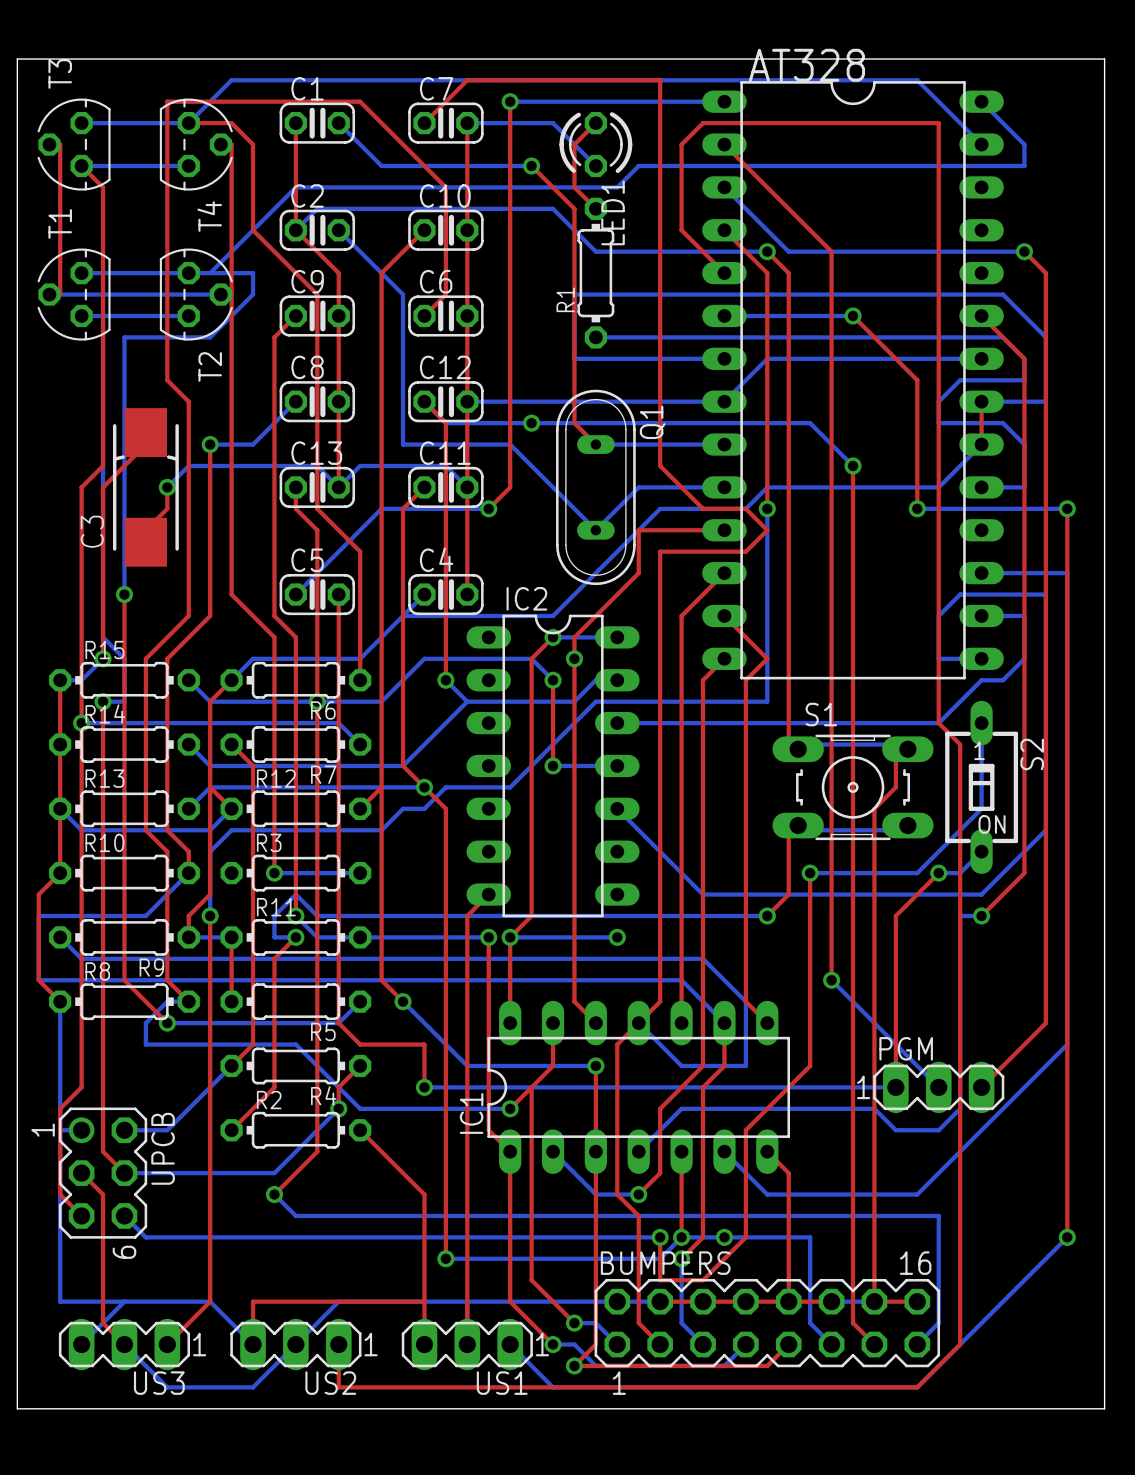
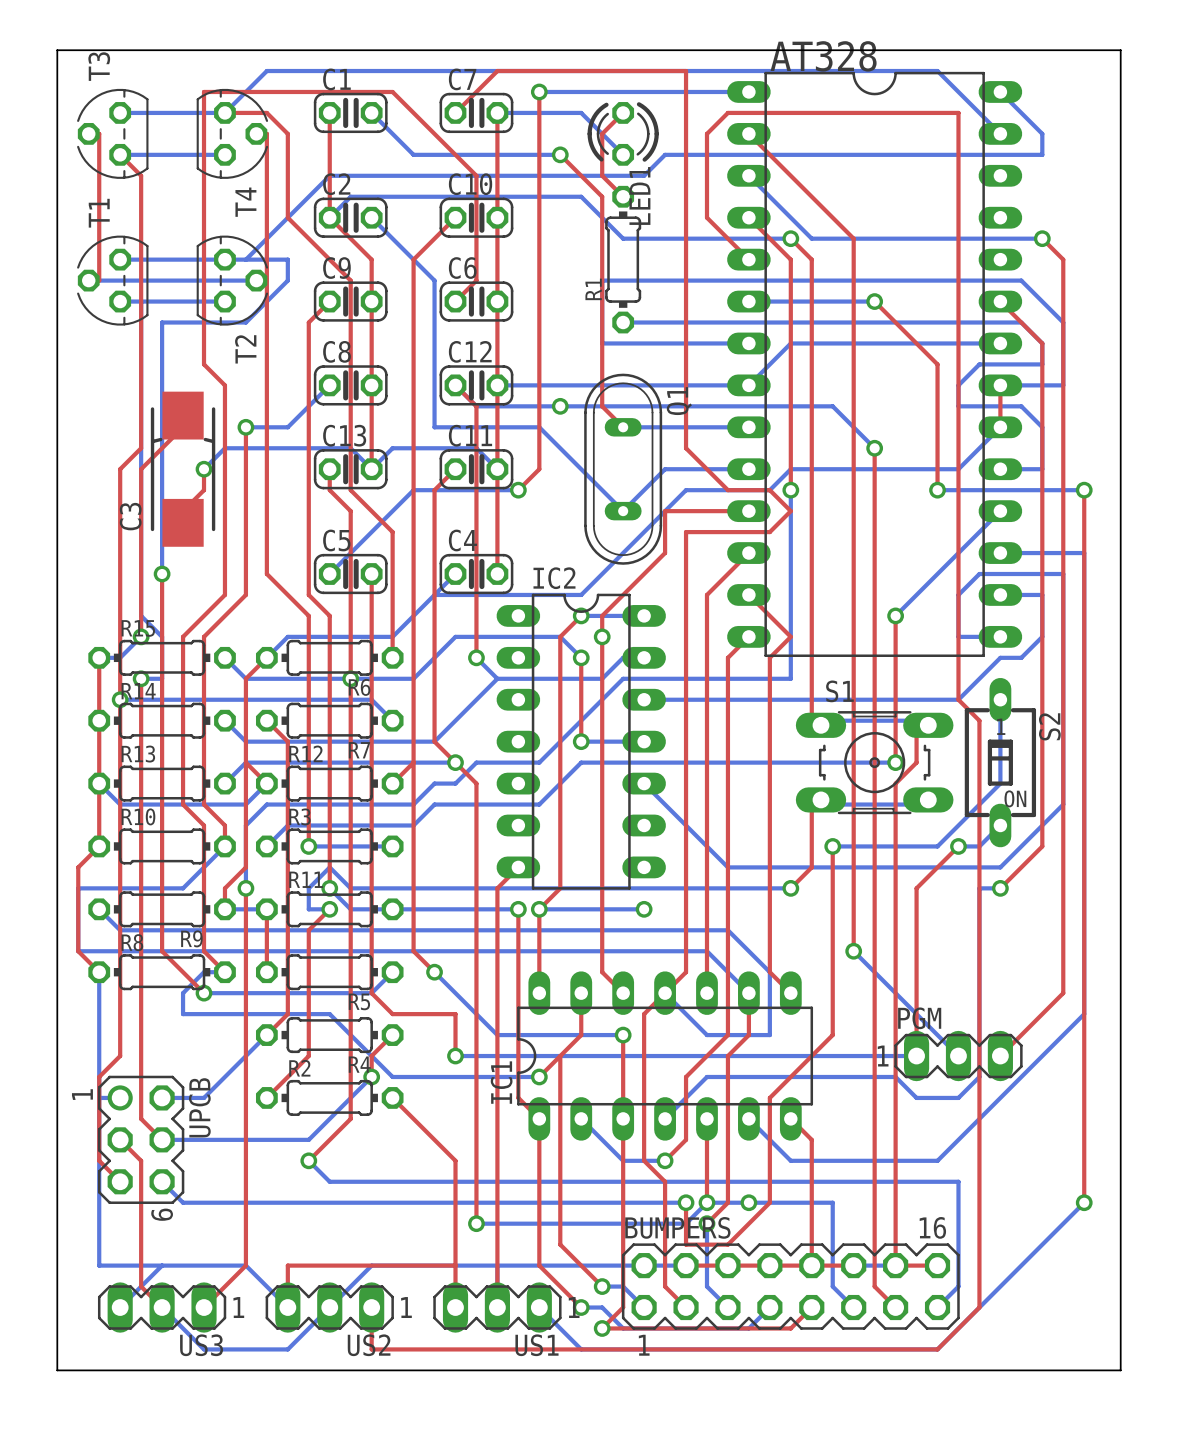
bottom track: none -> (1000, 511) (895, 615)
top track: none -> (895, 615) (895, 762)
via: none -> (895, 615)
bottom track: none -> (895, 762) (581, 762) (539, 804) (434, 804) (413, 825) (287, 825) (266, 846)
via: none -> (895, 762)

